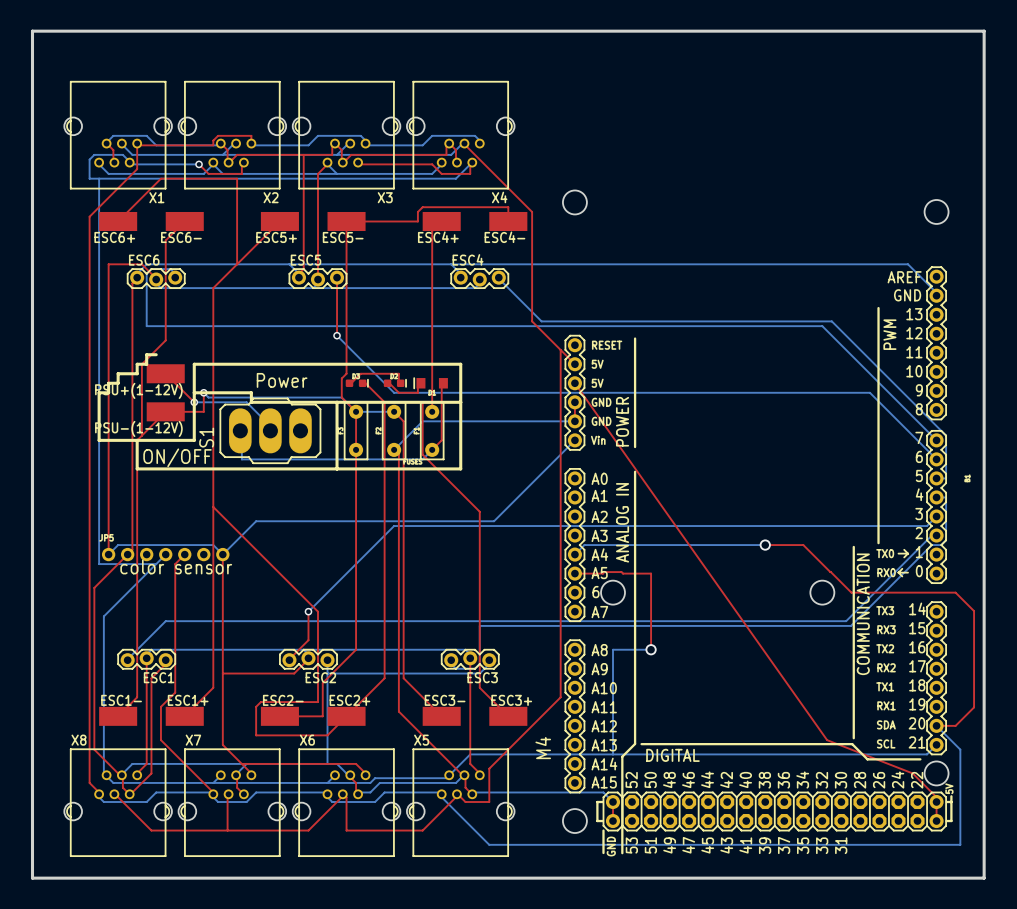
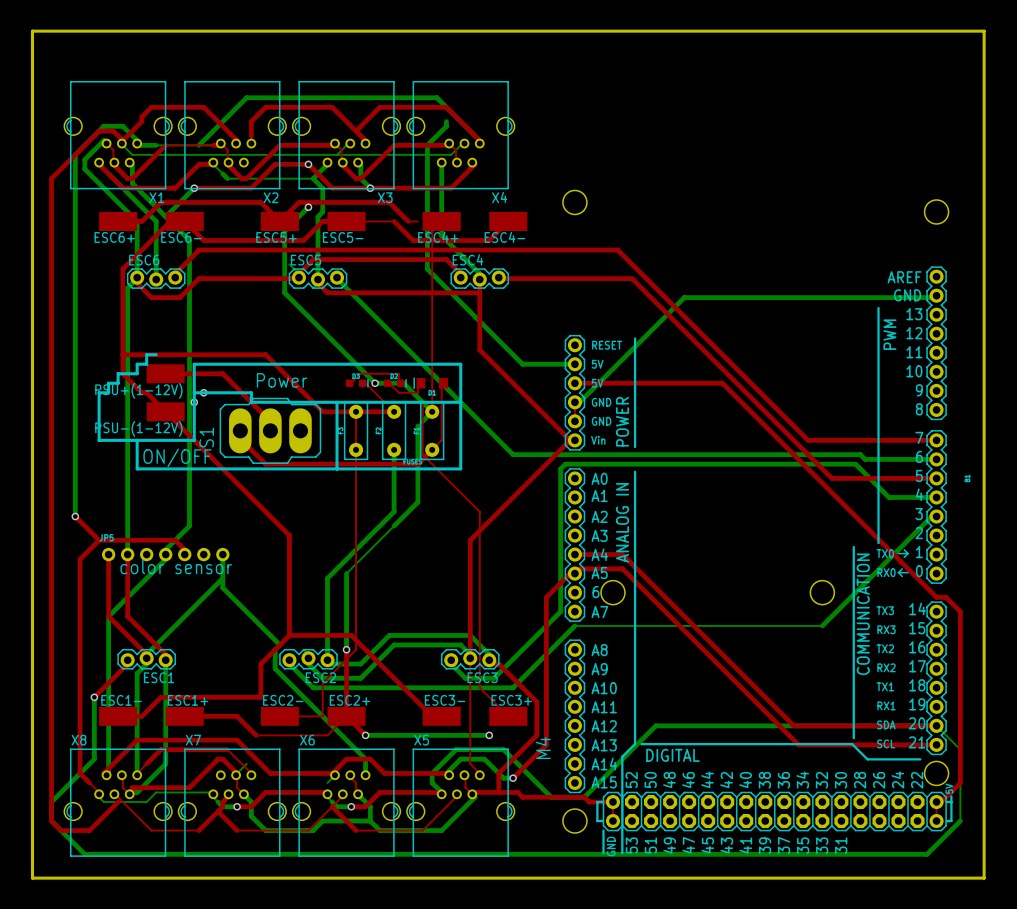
bottom track: none -> (446, 121) (446, 126) (427, 145) (427, 269) (522, 364) (574, 364)
top track: none -> (356, 131) (379, 107) (446, 107) (479, 140) (479, 143)
top track: (251, 135) (218, 135) (213, 140) (213, 145) -> (220, 143) (213, 145)
top track: none -> (251, 135) (251, 121) (265, 107) (332, 107) (365, 140) (365, 143)
bottom track: (475, 135) (432, 135) (422, 145) (365, 145) (365, 140) (360, 135) (317, 135) (308, 145) (251, 145) (251, 143) -> (475, 135) (436, 97) (246, 97) (199, 145)
top track: none -> (122, 140) (141, 121) (141, 116) (151, 107) (203, 107) (237, 140) (236, 143)
top track: none -> (122, 140) (113, 131) (99, 131) (51, 178) (51, 821) (61, 830) (89, 830) (118, 802)
bottom track: (106, 143) (113, 135) (146, 135) (156, 145) -> (106, 143) (103, 140) (84, 159) (84, 169) (137, 221) (137, 273)
top track: (137, 143) (137, 169) (89, 216) (89, 782) -> (99, 540) (80, 559) (80, 773) (89, 782)
bottom track: (236, 143) (222, 154) -> none
top track: (464, 143) (532, 211) (532, 321) (574, 364) -> none
top track: (137, 145) (165, 145) -> (114, 162) (113, 164) (127, 178) (132, 178) (165, 145)
bottom track: none -> (156, 145) (137, 145) (137, 140) (122, 126) (103, 126) (75, 154) (75, 516)
top track: (332, 145) (332, 154) (237, 154) (228, 162) -> (332, 145) (279, 145) (246, 178) (241, 178) (227, 164) (228, 162)
top track: (446, 145) (446, 154) (351, 154) (342, 162) -> (446, 145) (394, 145) (360, 178) (356, 178) (341, 164) (342, 162)
top track: (303, 154) (303, 269) -> (460, 277) (460, 273) (446, 259) (313, 259) (303, 269)
top track: none -> (99, 162) (122, 188) (175, 188) (199, 164) (213, 164) (213, 162)
bottom track: (129, 162) (122, 154) (94, 154) (89, 159) (89, 178) (227, 178) -> (222, 173) (227, 178)
top track: (243, 162) (241, 164) (241, 173) (208, 173) (199, 164) -> none
top track: (327, 162) (317, 173) (317, 279) -> (479, 292) (327, 292) (317, 283) (317, 279)
top track: (358, 162) (360, 164) (432, 164) (441, 173) (470, 173) (470, 164) (472, 162) -> (194, 188) (251, 188) (275, 164) (308, 164) (332, 188) (451, 188) (475, 164) (472, 162)
bottom track: none -> (358, 162) (360, 164) (360, 178) (370, 188)
bottom track: (472, 162) (455, 178) (313, 178) -> none
bottom track: (132, 164) (199, 164) -> (132, 164) (132, 183) (189, 240) (189, 526) (165, 549) (165, 559) (108, 616) (108, 773) (106, 775)
via position: (199, 164) -> (194, 188)
bottom track: (213, 164) (203, 173) (108, 173) -> (156, 279) (156, 221) (108, 173)
via: none -> (308, 164)
bottom track: (327, 164) (337, 173) -> (327, 164) (313, 178) (322, 188) (322, 211) (317, 216) (317, 279)
bottom track: (441, 164) (432, 173) (222, 173) -> (441, 164) (441, 235) (479, 273) (479, 279)
bottom track: (99, 178) (99, 564) (156, 564) -> none
bottom track: none -> (194, 188) (165, 216)
via: none -> (370, 188)
via: none -> (308, 207)
top track: (118, 221) (160, 178) (237, 178) (237, 264) -> (118, 221) (141, 221) (160, 202) (260, 202) (279, 221) (298, 202) (389, 202) (408, 221)
top track: (184, 221) (165, 240) (165, 340) (141, 364) (141, 435) -> none
top track: (279, 221) (213, 288) (213, 687) (184, 716) -> none
top track: (346, 221) (346, 373) (341, 378) (341, 397) (356, 411) -> (346, 221) (322, 221) (303, 240) (203, 240) (184, 221) (170, 221) (122, 269) (122, 373) (141, 392) (146, 392) (289, 535) (289, 635)
top track: (394, 221) (408, 221) -> none
top track: (417, 221) (417, 211) (422, 207) (508, 207) (508, 221) -> (394, 221) (413, 240) (489, 240) (508, 221)
bottom track: (137, 273) (146, 264) (908, 264) (936, 292) (936, 295) -> (574, 402) (579, 402) (684, 297) (936, 297) (936, 295)
bottom track: none -> (137, 277) (127, 288) (127, 554)
top track: none -> (175, 277) (175, 273) (199, 250) (617, 250) (808, 440) (936, 440)
bottom track: (175, 277) (175, 273) (170, 269) (151, 269) (146, 273) (146, 326) (822, 326) (936, 440) -> none
top track: (337, 277) (337, 335) -> none
top track: none -> (498, 277) (632, 278) (831, 478) (936, 478)
bottom track: (498, 277) (541, 321) (831, 321) (946, 435) (946, 478) (936, 478) -> none
top track: (137, 278) (132, 283) (132, 549) (94, 587) (94, 749) (121, 775) -> (137, 278) (137, 283) (151, 297) (180, 297) (199, 278) (298, 277)
top track: (156, 279) (141, 264) (108, 264) (108, 554) -> (146, 658) (146, 654) (108, 616) (108, 554)
bottom track: (156, 279) (156, 283) (160, 288) (475, 288) (479, 283) (479, 279) -> none
top track: none -> (479, 279) (479, 349) (570, 440)
bottom track: (337, 335) (394, 392) (869, 392) (936, 459) -> (337, 277) (513, 454) (860, 454) (865, 459) (936, 459)
via: (337, 335) -> none
top track: (560, 349) (560, 697) (489, 768) (489, 802) (465, 802) (456, 794) -> none
top track: none -> (122, 354) (265, 354) (322, 411) (394, 411)
top track: (165, 373) (194, 402) -> (165, 373) (222, 373) (270, 421) (270, 430)
via: none -> (375, 383)
top track: (574, 383) (827, 740) (912, 773) (936, 797) (936, 802) -> (574, 383) (722, 383) (936, 597) (946, 597) (960, 611) (960, 782) (936, 806)
top track: (203, 392) (203, 411) (165, 411) (137, 440) (137, 697) (118, 716) -> (289, 635) (260, 664) (260, 697) (160, 697) (141, 716) (118, 716)
bottom track: (203, 392) (208, 397) (341, 397) (356, 411) (394, 411) -> none
bottom track: (194, 402) (246, 402) (270, 426) (270, 430) -> none
top track: (432, 402) (384, 402) (384, 678) (346, 716) -> none
top track: (394, 411) (403, 421) (403, 678) (441, 716) -> (289, 635) (351, 635) (432, 716) (441, 716)
bottom track: (422, 421) (574, 421) -> (422, 421) (432, 411) (403, 383) (375, 383) (284, 292) (284, 231) (308, 207)
bottom track: (417, 426) (394, 449) -> (417, 426) (417, 502) (394, 526)
top track: none -> (240, 430) (241, 430) (241, 440) (265, 464) (417, 464) (432, 449)
bottom track: (240, 430) (241, 430) (241, 459) (422, 459) (432, 449) -> none
top track: none -> (570, 440) (470, 540) (470, 658)
bottom track: (574, 440) (494, 521) (256, 521) (222, 554) (213, 545) (118, 545) (108, 554) -> none
top track: (394, 449) (398, 454) (398, 711) (464, 775) -> none
bottom track: none -> (394, 449) (394, 511) (327, 578) (327, 660)
bottom track: (936, 497) (946, 497) (946, 540) (941, 545) (931, 545) (850, 625) (822, 625) -> (936, 516) (931, 516) (822, 625)
bottom track: none -> (936, 497) (888, 497) (855, 464) (565, 464) (560, 468) (560, 611) (494, 678) (465, 678) (455, 668)
top track: (213, 506) (317, 611) (317, 702) (260, 702) (256, 706) (256, 735) -> (184, 716) (237, 716) (256, 735)
top track: none -> (75, 516) (99, 540)
via: none -> (75, 516)
bottom track: (936, 516) (927, 526) (394, 526) -> none
bottom track: (936, 535) (931, 535) (846, 621) (165, 621) (127, 660) -> none
top track: (765, 545) (803, 545) (851, 592) (955, 592) (974, 611) (974, 707) (955, 725) (936, 725) -> (574, 554) (622, 554) (793, 725) (936, 725)
bottom track: (765, 545) (584, 545) (574, 554) -> none
via: (765, 545) -> none
top track: none -> (127, 554) (127, 616) (165, 654) (165, 660)
bottom track: (165, 554) (103, 616) (103, 773) (113, 782) (370, 782) (375, 778) (446, 778) (470, 754) (927, 754) (936, 744) -> none
top track: (184, 554) (175, 564) (175, 692) (160, 706) (160, 740) (213, 794) -> (184, 554) (184, 549) (175, 540) (99, 540)
top track: (222, 554) (222, 744) (227, 749) -> none
bottom track: none -> (222, 554) (222, 587) (279, 644) (275, 649) (275, 668) (365, 759) (365, 775)
bottom track: (346, 573) (308, 611) -> (346, 573) (346, 649)
top track: (574, 573) (604, 572) (651, 573) (651, 649) -> none
bottom track: none -> (222, 578) (151, 649)
top track: (308, 611) (308, 640) (289, 660) -> none
via: (308, 611) -> none
bottom track: (574, 625) (479, 625) (479, 664) (475, 668) (455, 668) -> (574, 625) (513, 687) (313, 687) (289, 664) (289, 660)
bottom track: (151, 649) (465, 649) -> (308, 658) (308, 664) (322, 678) (360, 678) (394, 644) (460, 644) (465, 649)
top track: none -> (346, 649) (346, 716) (365, 735)
via: none -> (346, 649)
bottom track: (651, 649) (613, 649) (613, 754) -> none
via: (651, 649) -> none
top track: (146, 658) (146, 763) -> (227, 749) (160, 749) (146, 763)
bottom track: none -> (146, 658) (146, 664) (137, 673) (137, 775)
top track: (308, 658) (294, 673) (222, 673) -> none
top track: none -> (127, 660) (127, 664) (94, 697)
top track: (165, 660) (165, 664) (151, 678) (151, 773) (132, 792) -> (236, 775) (237, 773) (222, 759) (218, 759) (189, 787) (132, 787) (132, 792)
bottom track: none -> (165, 660) (165, 763) (137, 792) (129, 794)
top track: none -> (489, 660) (489, 664) (498, 664) (536, 702) (536, 735) (498, 773) (498, 792)
bottom track: (489, 660) (489, 664) (479, 673) (327, 673) -> (489, 660) (489, 654) (470, 635) (389, 635) (360, 664) (327, 664)
bottom track: (327, 664) (327, 763) -> none
via: none -> (94, 697)
bottom track: none -> (936, 725) (655, 725) (584, 797) (551, 797) (503, 749) (455, 749) (432, 773) (432, 782) (441, 792)
bottom track: none -> (365, 735) (489, 735)
via: none -> (365, 735)
via: none -> (489, 735)
top track: none -> (936, 744) (798, 744) (622, 568) (579, 568) (574, 573) (570, 573) (546, 597) (546, 744) (513, 778)
top track: (241, 763) (356, 763) (365, 775) -> none
top track: none -> (332, 773) (270, 773) (237, 740) (137, 740) (103, 773) (106, 775)
top track: none -> (332, 773) (346, 759) (370, 759) (384, 773) (446, 773) (449, 775)
bottom track: (121, 775) (132, 763) (337, 763) (350, 775) -> none
bottom track: (220, 775) (213, 782) -> none
bottom track: none -> (449, 775) (446, 773) (460, 759) (484, 759) (503, 778) (513, 778)
bottom track: (464, 775) (455, 782) (379, 782) (370, 792) (358, 794) -> (370, 821) (370, 806) (358, 794)
via: none -> (513, 778)
bottom track: (441, 792) (384, 792) (375, 802) (332, 802) -> (351, 806) (337, 806) (332, 802)
bottom track: none -> (243, 794) (251, 802) (251, 816) (265, 830) (313, 830) (322, 821) (370, 821)
top track: none -> (327, 794) (327, 792) (265, 792) (251, 806) (237, 806)
bottom track: (327, 794) (327, 792) (256, 792) (246, 802) (218, 802) -> (237, 806) (222, 806) (218, 802)
top track: (342, 794) (346, 797) (346, 830) (356, 830) -> (332, 806) (356, 830)
top track: none -> (441, 794) (441, 792) (379, 792) (365, 806) (351, 806)
bottom track: (441, 794) (441, 797) (489, 844) (960, 844) (960, 821) -> (94, 697) (94, 759) (51, 802) (51, 821) (84, 854) (927, 854) (960, 821)
top track: none -> (472, 794) (475, 792) (517, 792) (522, 797) (584, 797) (589, 802) (613, 802)
bottom track: (472, 794) (475, 792) (603, 792) (613, 802) -> (472, 794) (475, 797) (441, 830) (379, 830) (370, 821)
top track: (227, 797) (227, 830) -> (227, 797) (222, 802) (222, 806) (199, 830)
via: none -> (237, 806)
via: none -> (351, 806)
top track: (199, 830) (237, 830) -> (218, 811) (237, 830)

